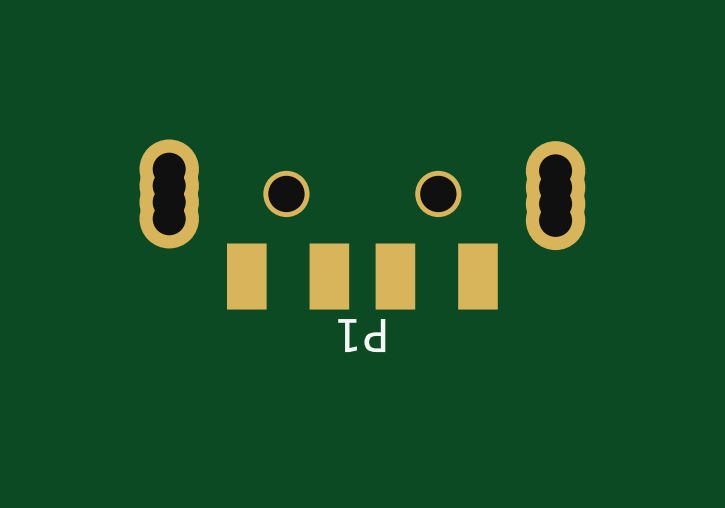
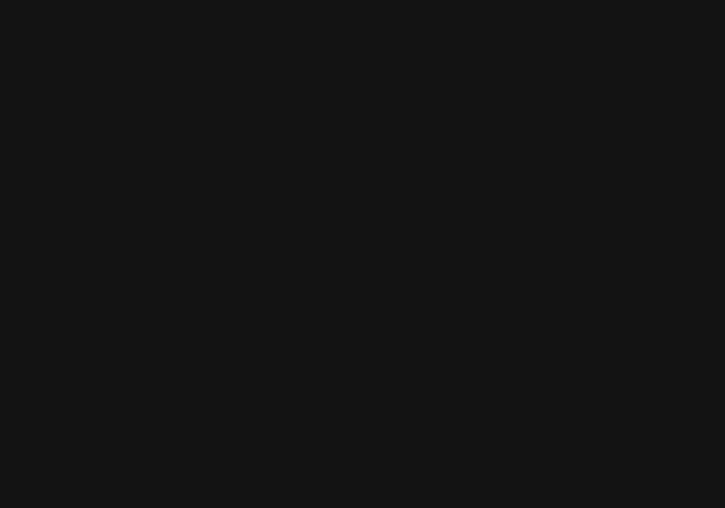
P1: (362, 224) -> none

